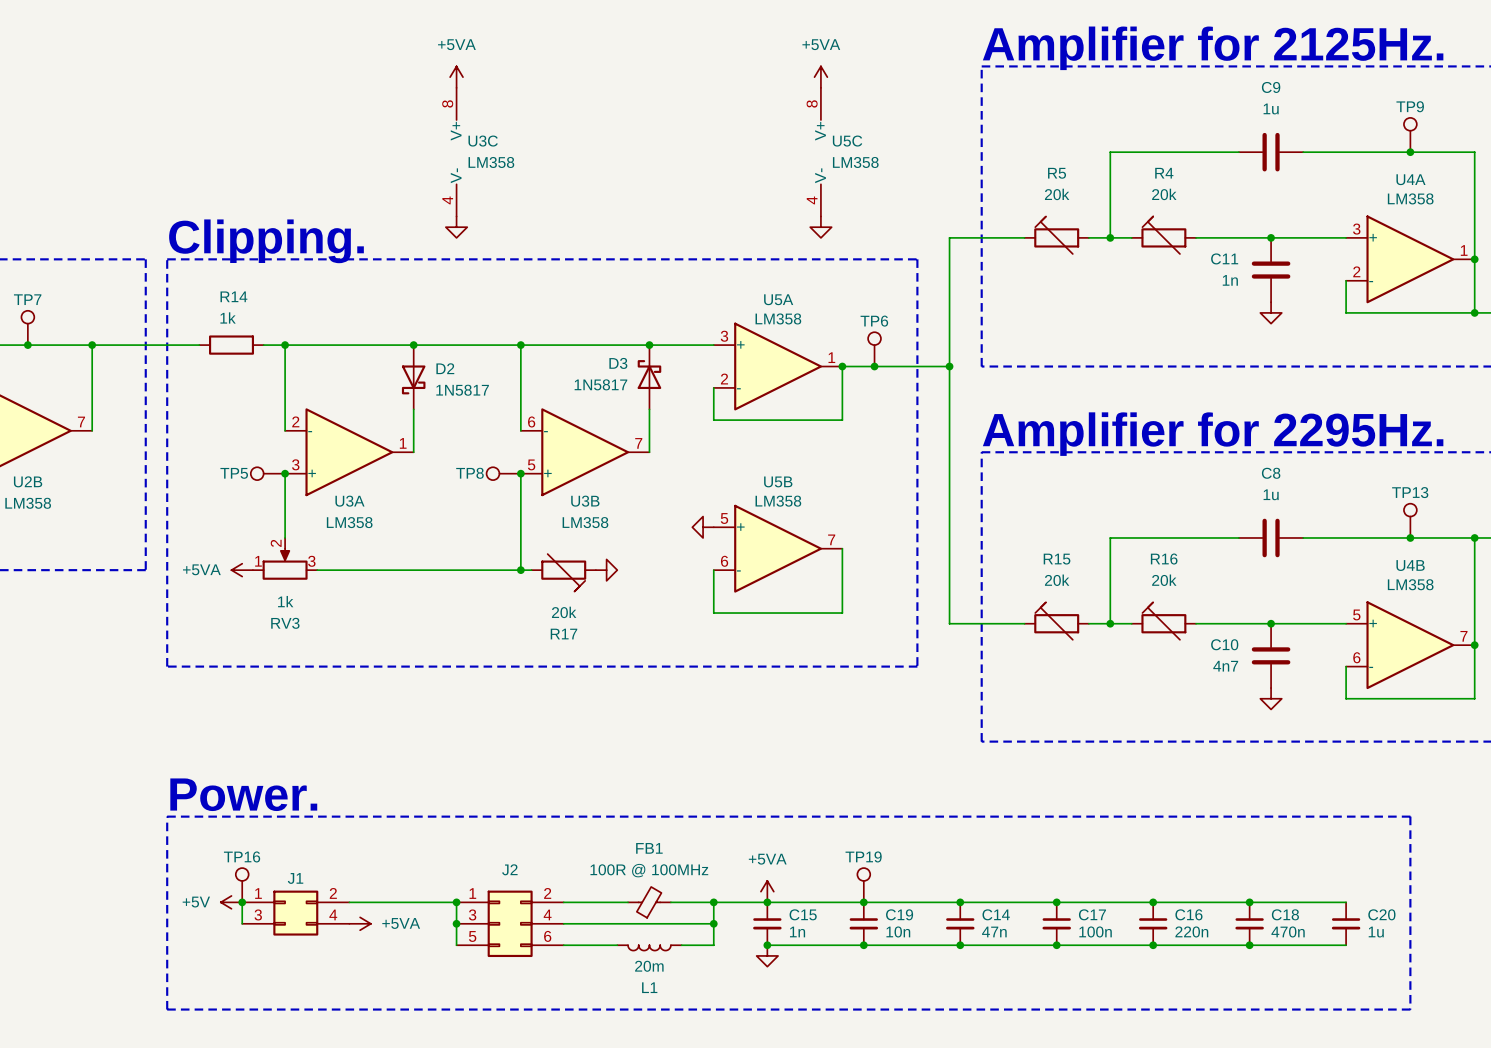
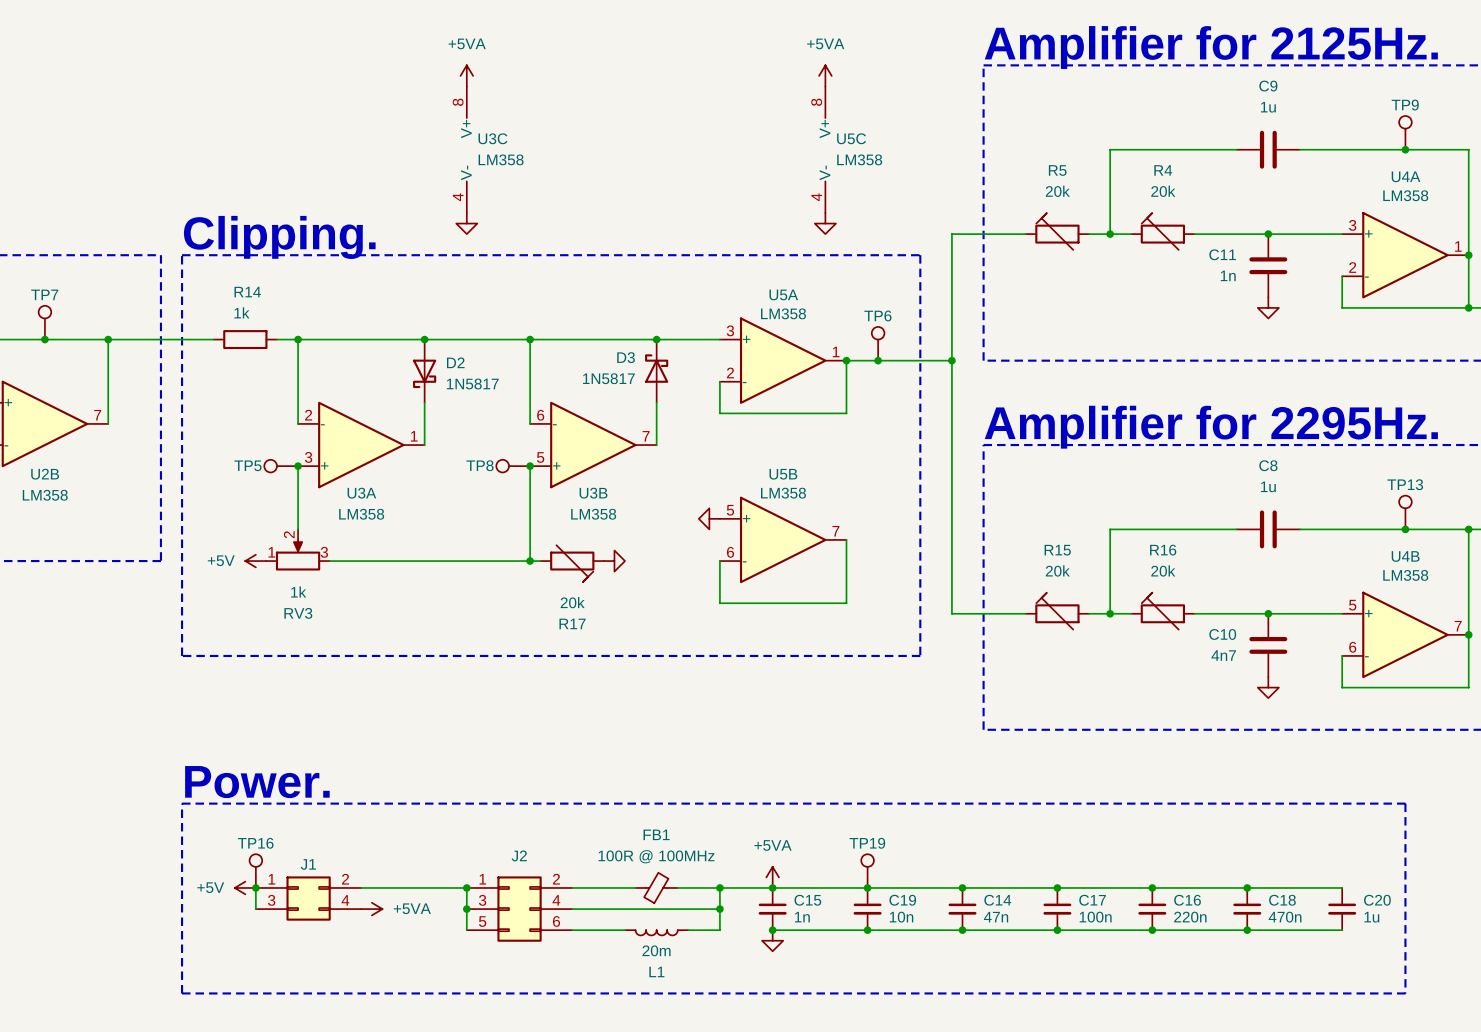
power symbol: +5VA (242, 570) -> +5V (255, 561)

